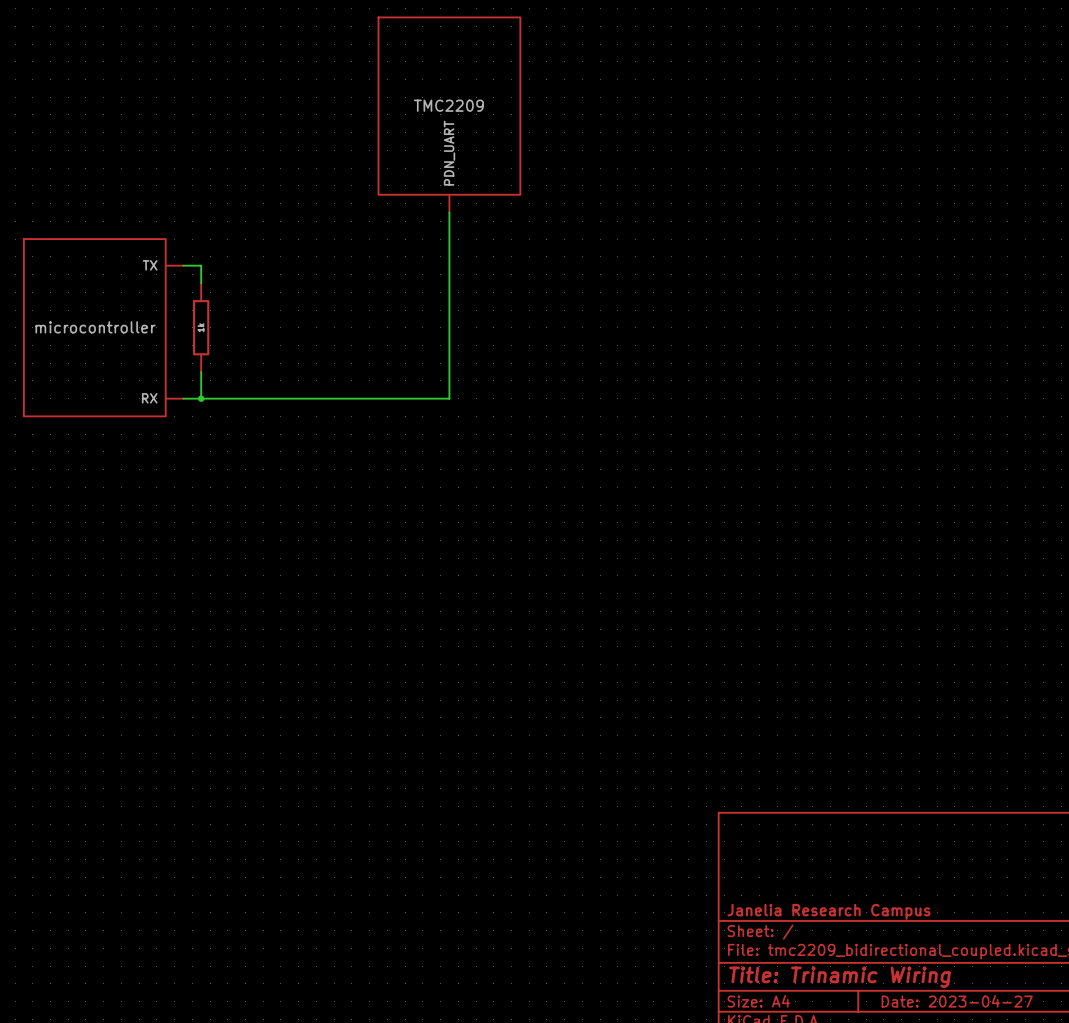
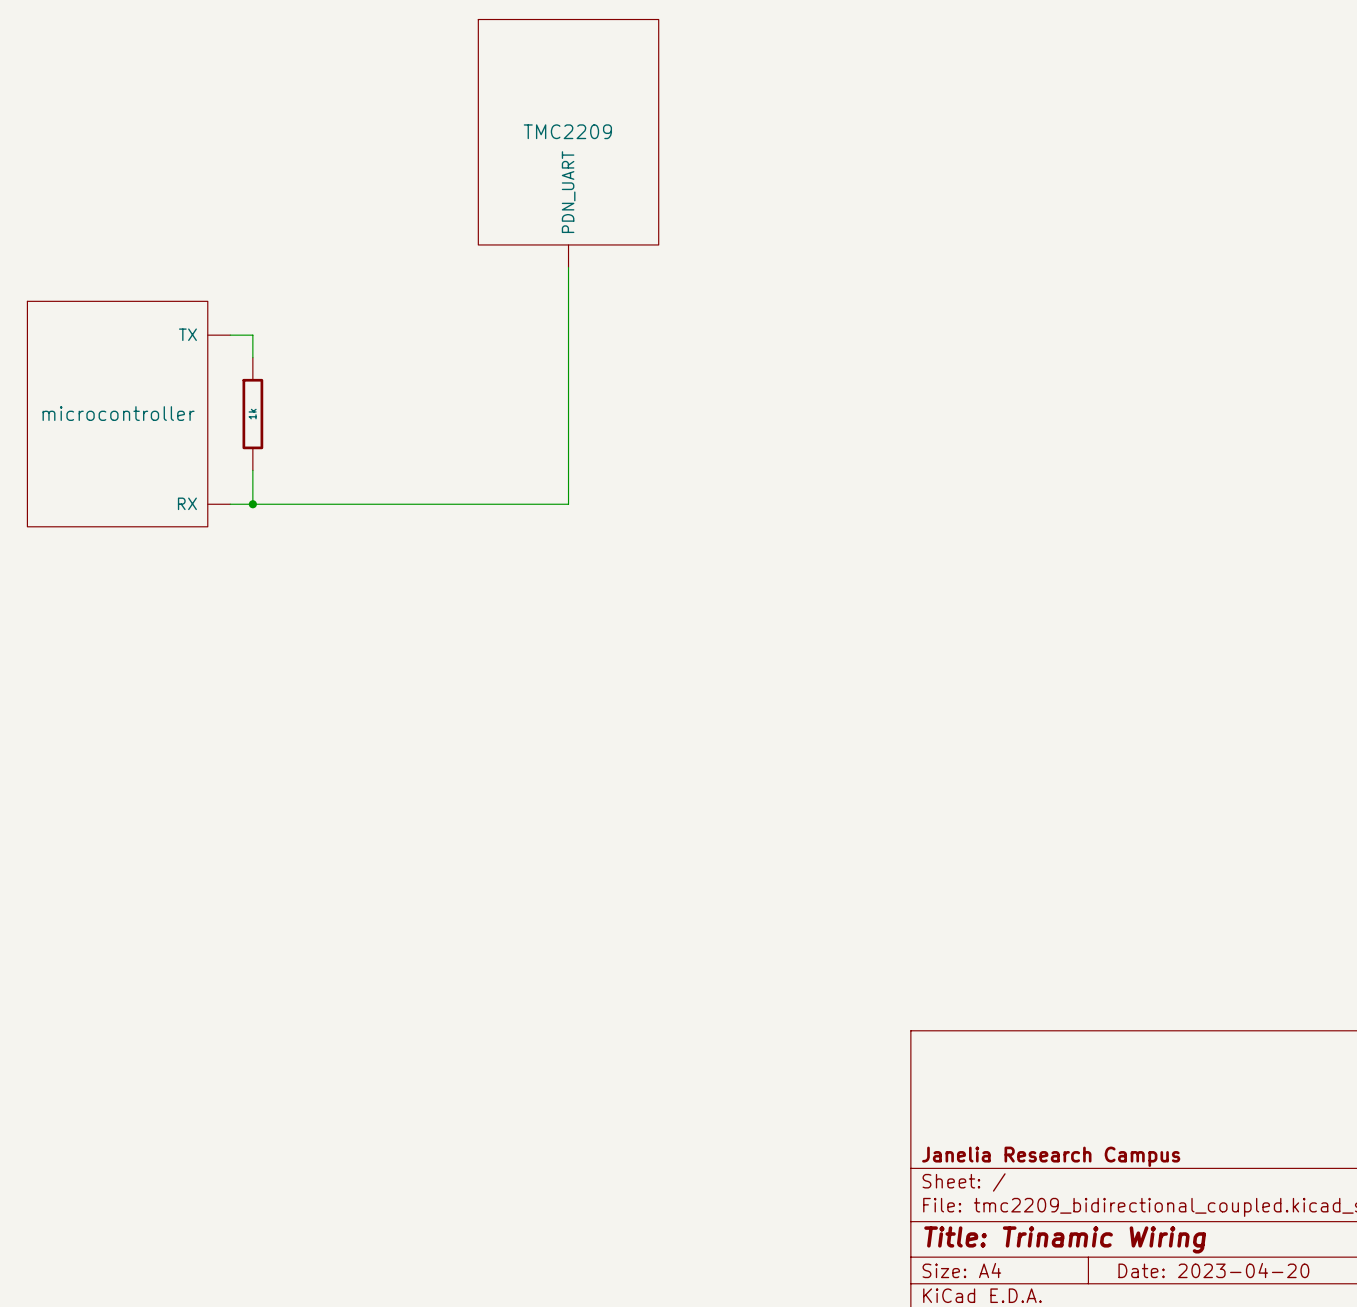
title block: Date: 2023-04-27 (957, 1001) -> Date: 2023-04-20 (1213, 1270)

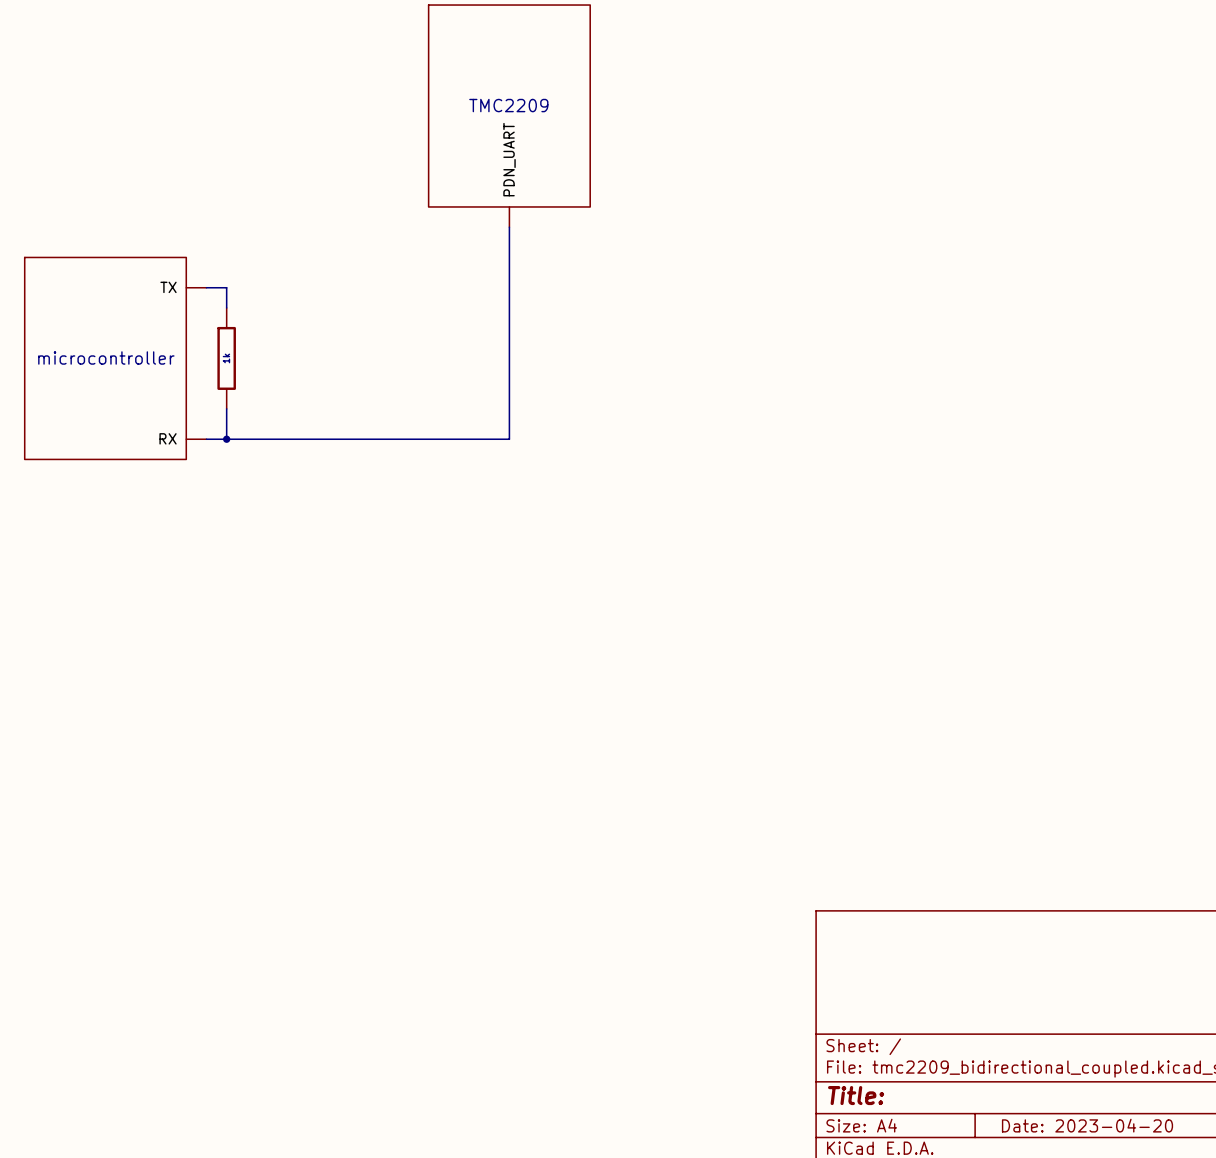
title block: Janelia Research Campus (1051, 1156) -> none
title block: Title: Trinamic Wiring (1065, 1239) -> Title: (856, 1095)

